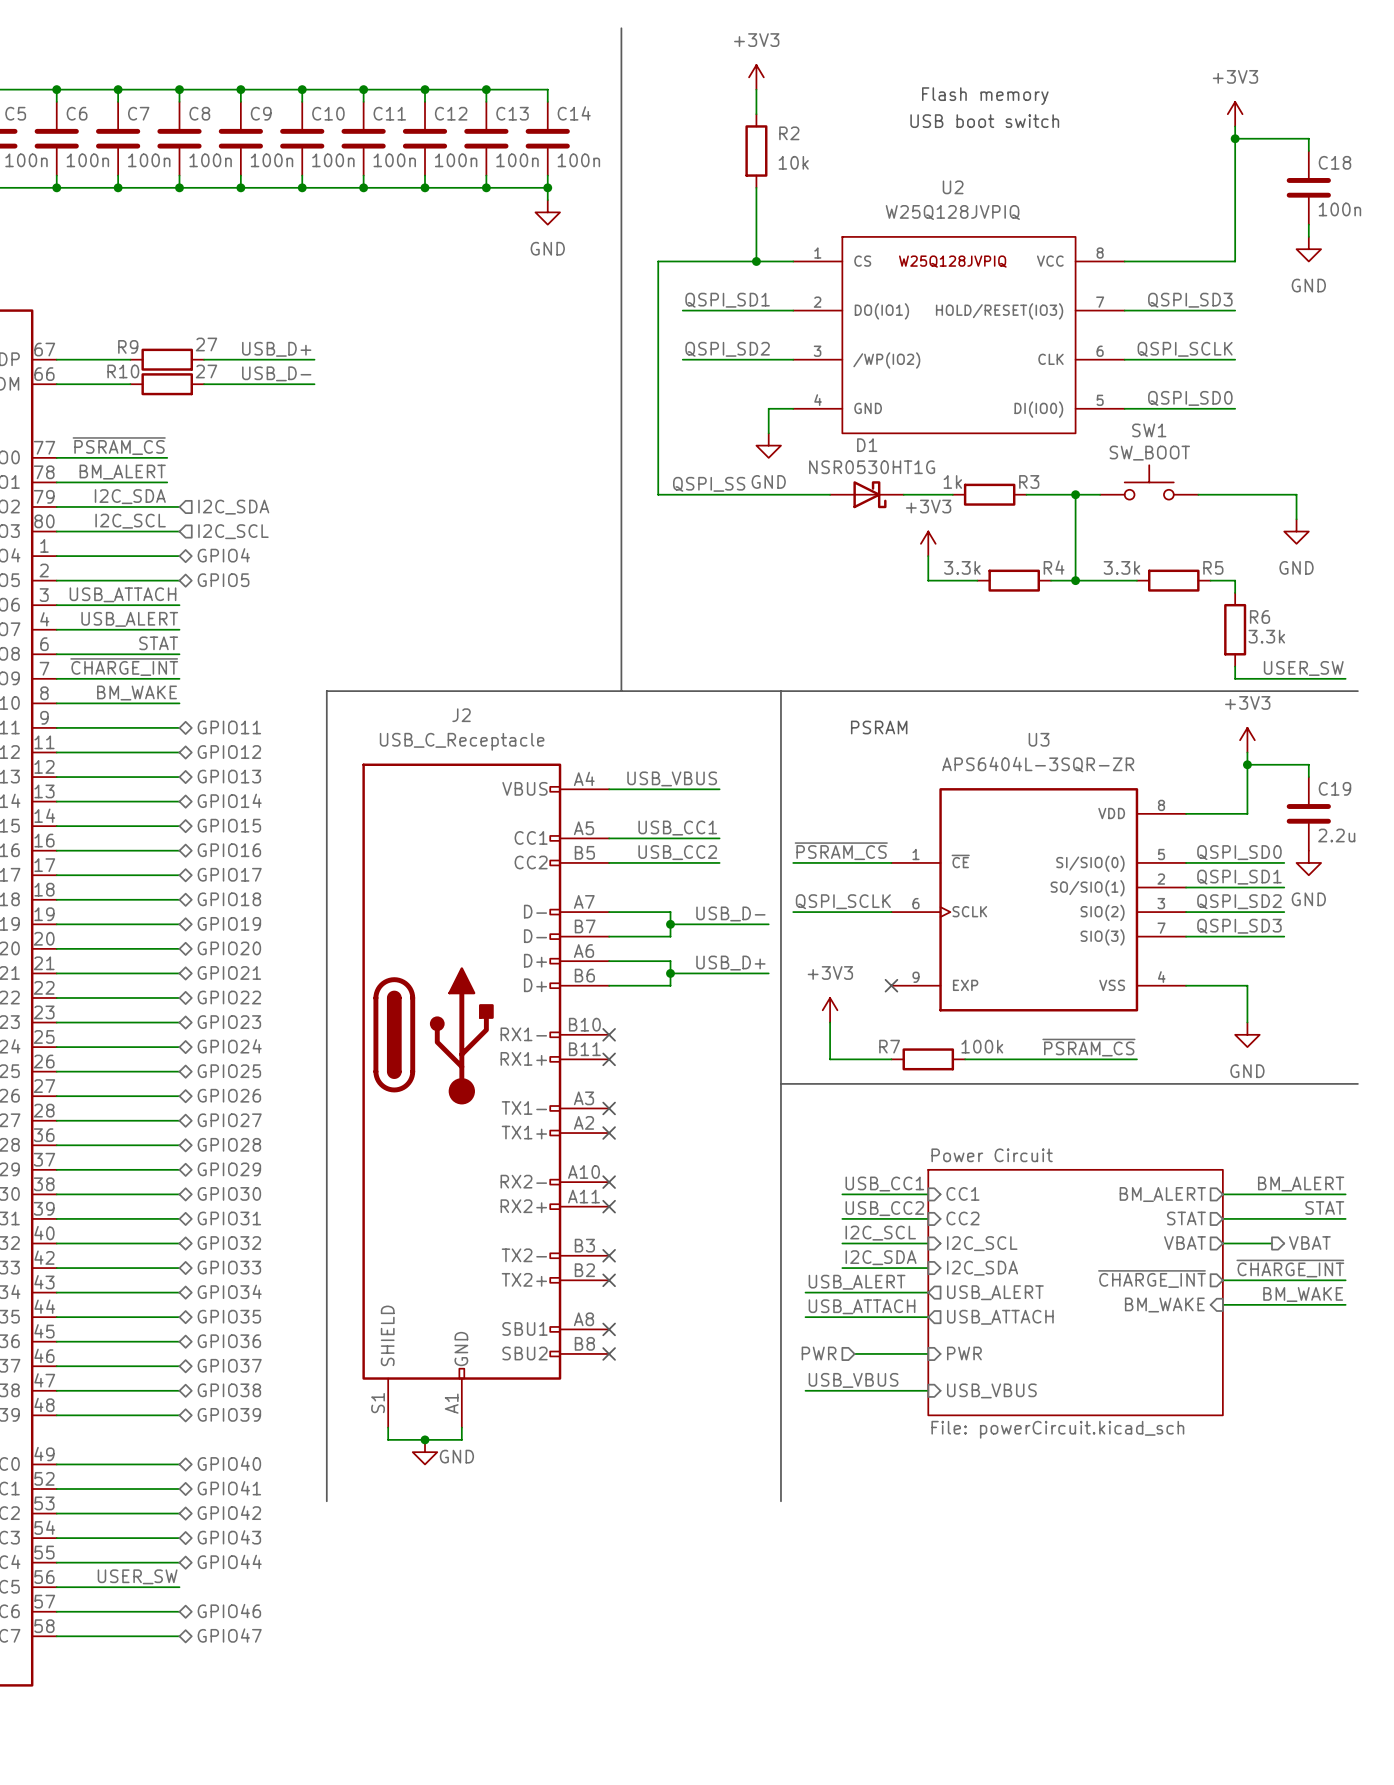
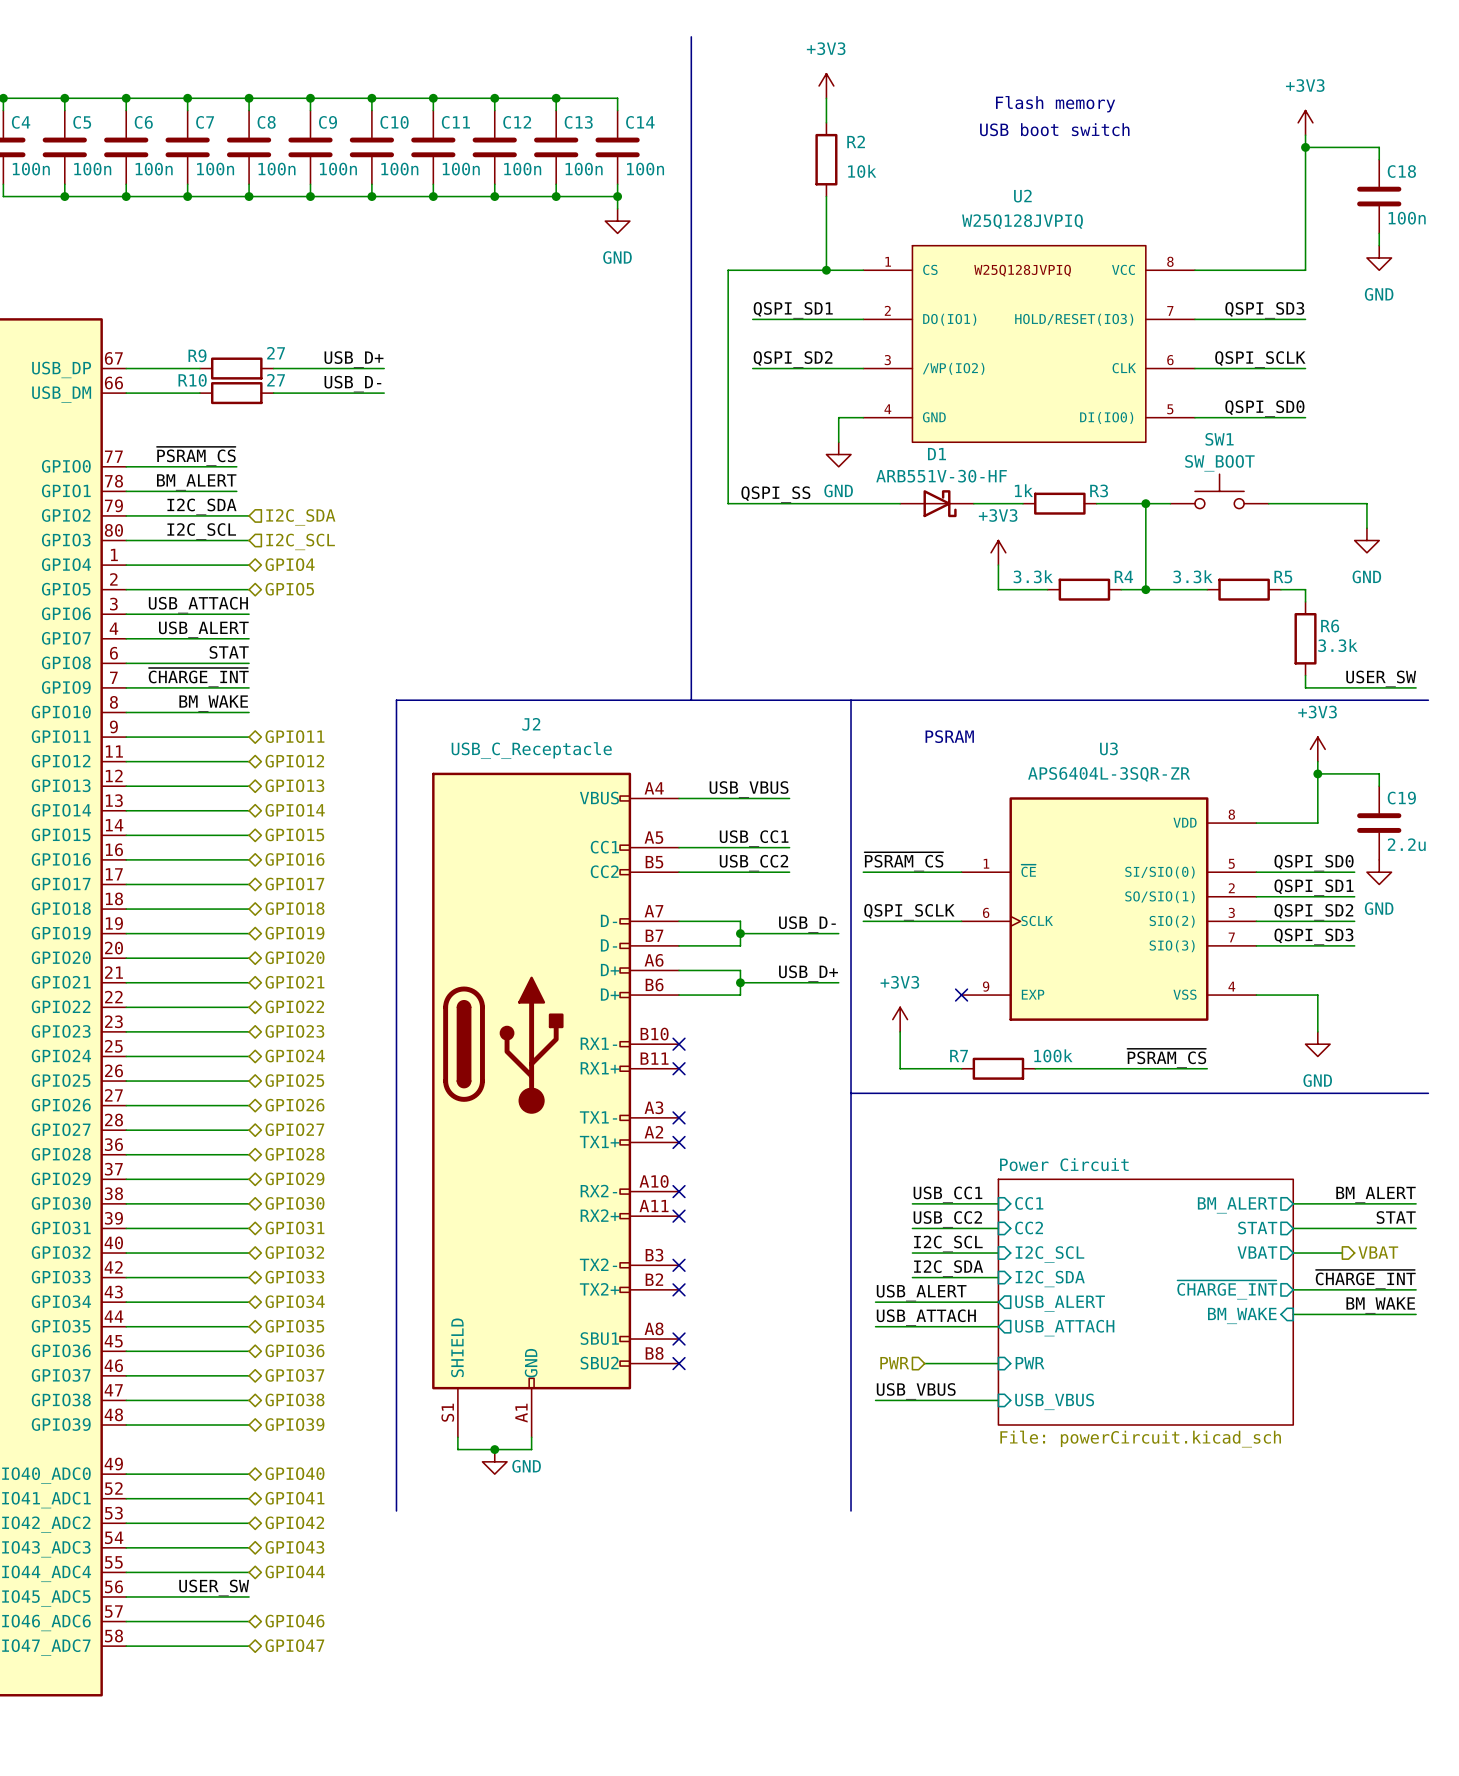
D1 value: NSR0530HT1G (872, 467) -> ARB551V-30-HF (941, 476)

